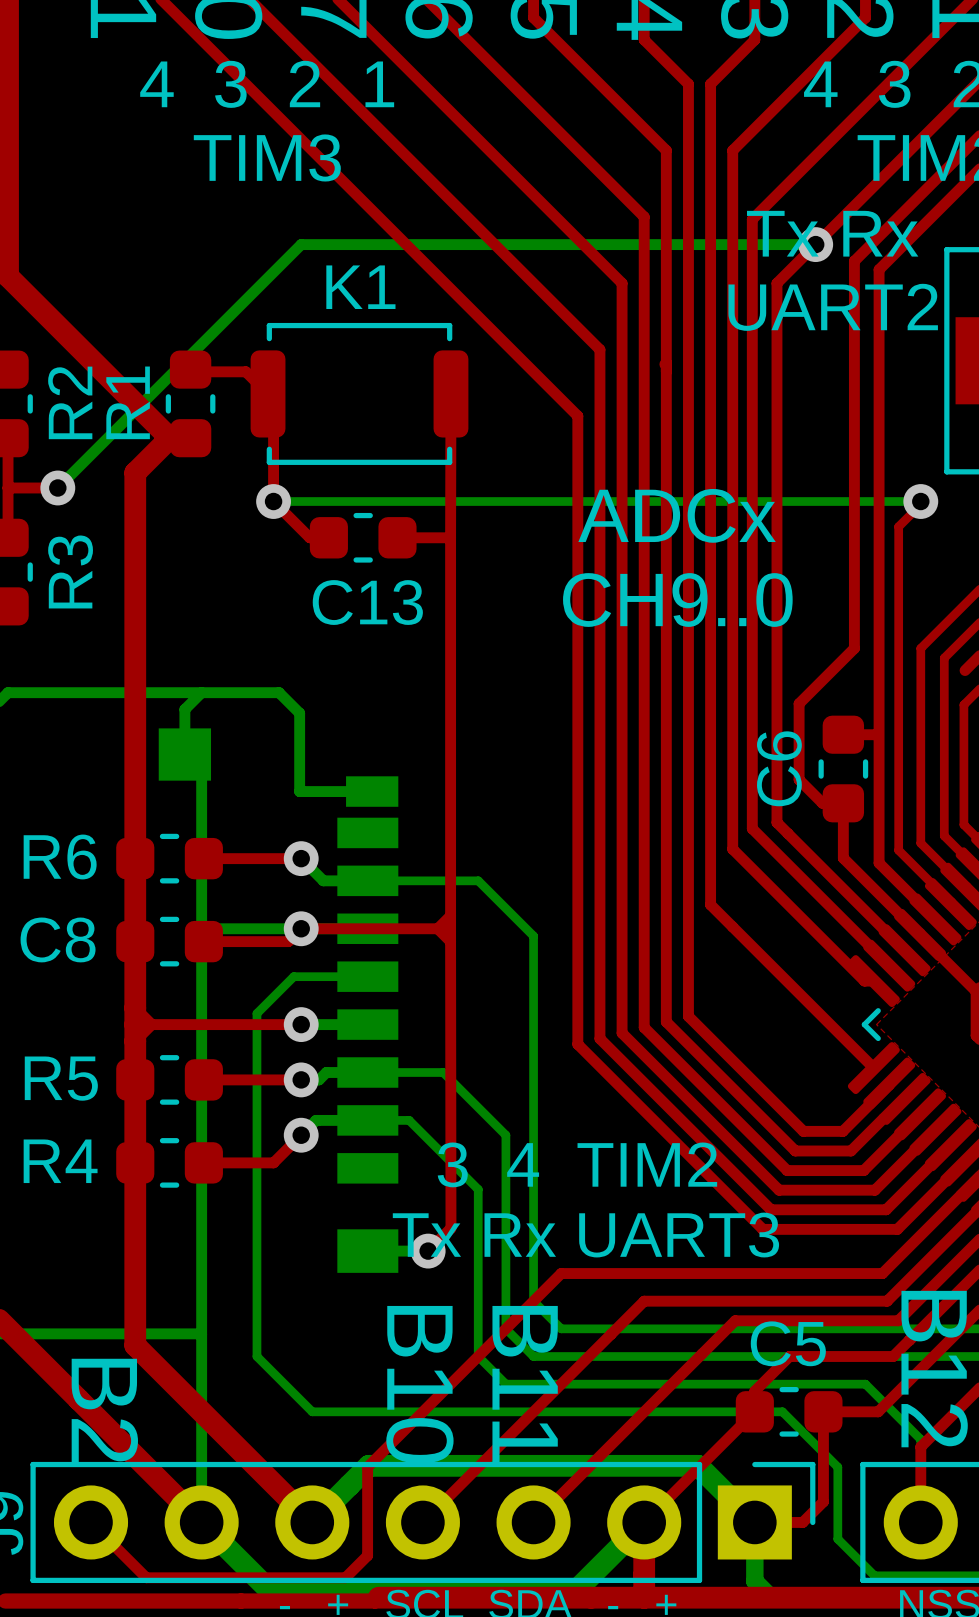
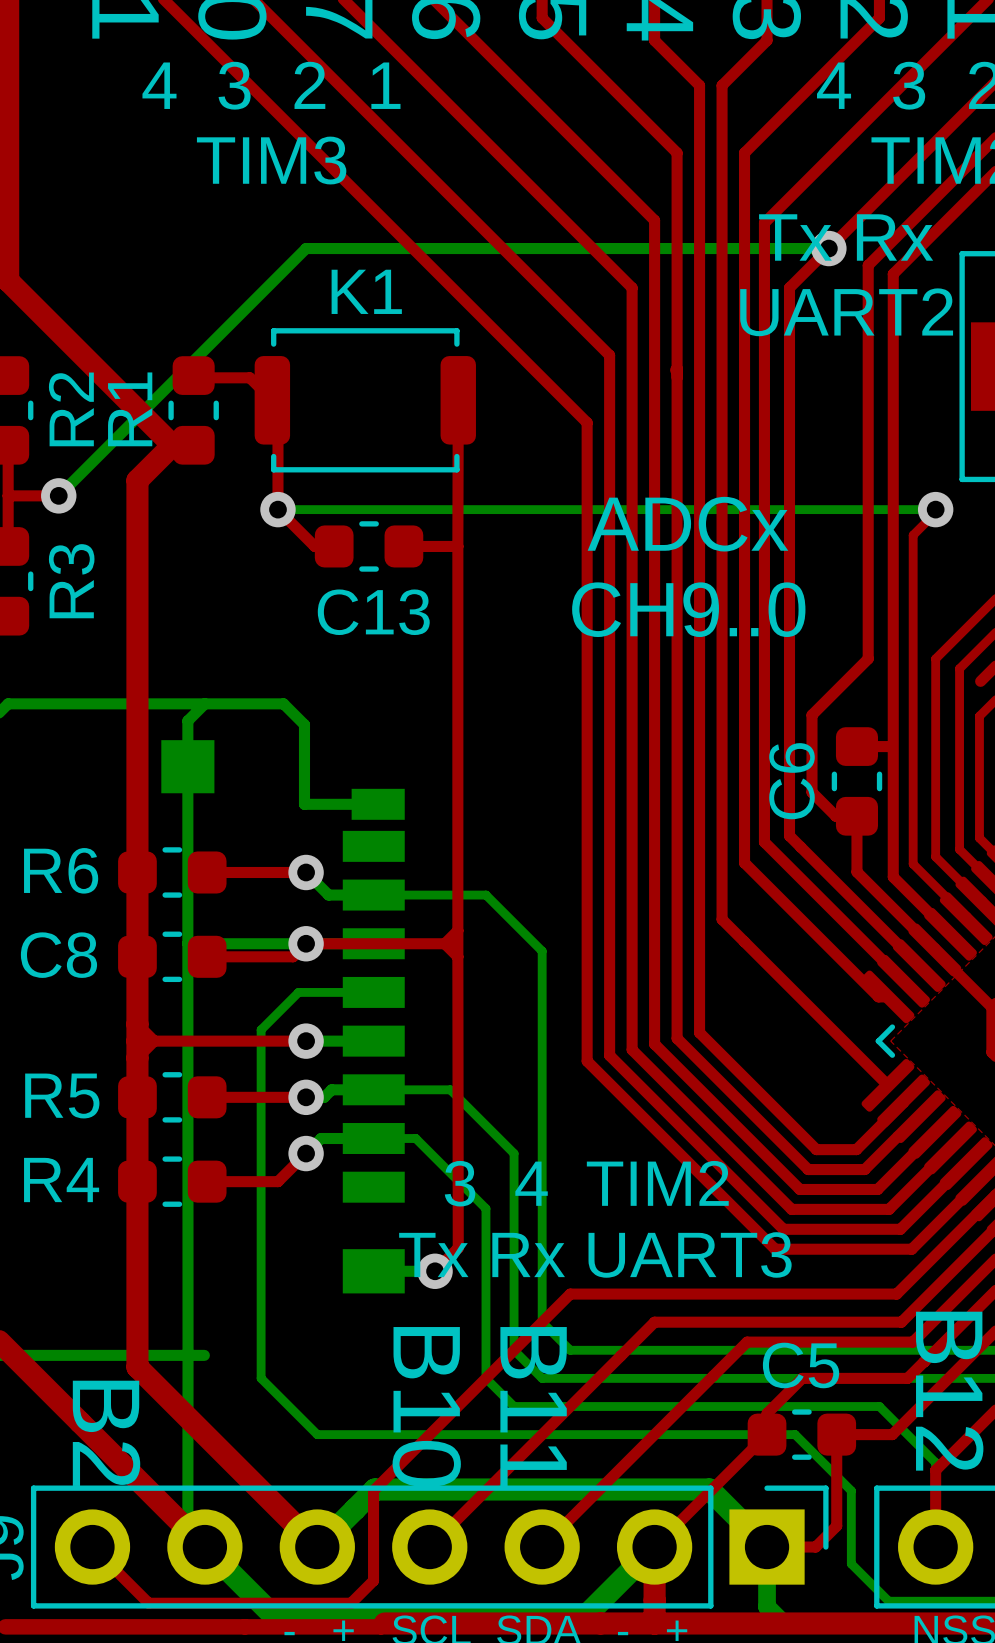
bottom track: (184, 754) (201, 771) (201, 1522) -> (187, 766) (187, 1529)

